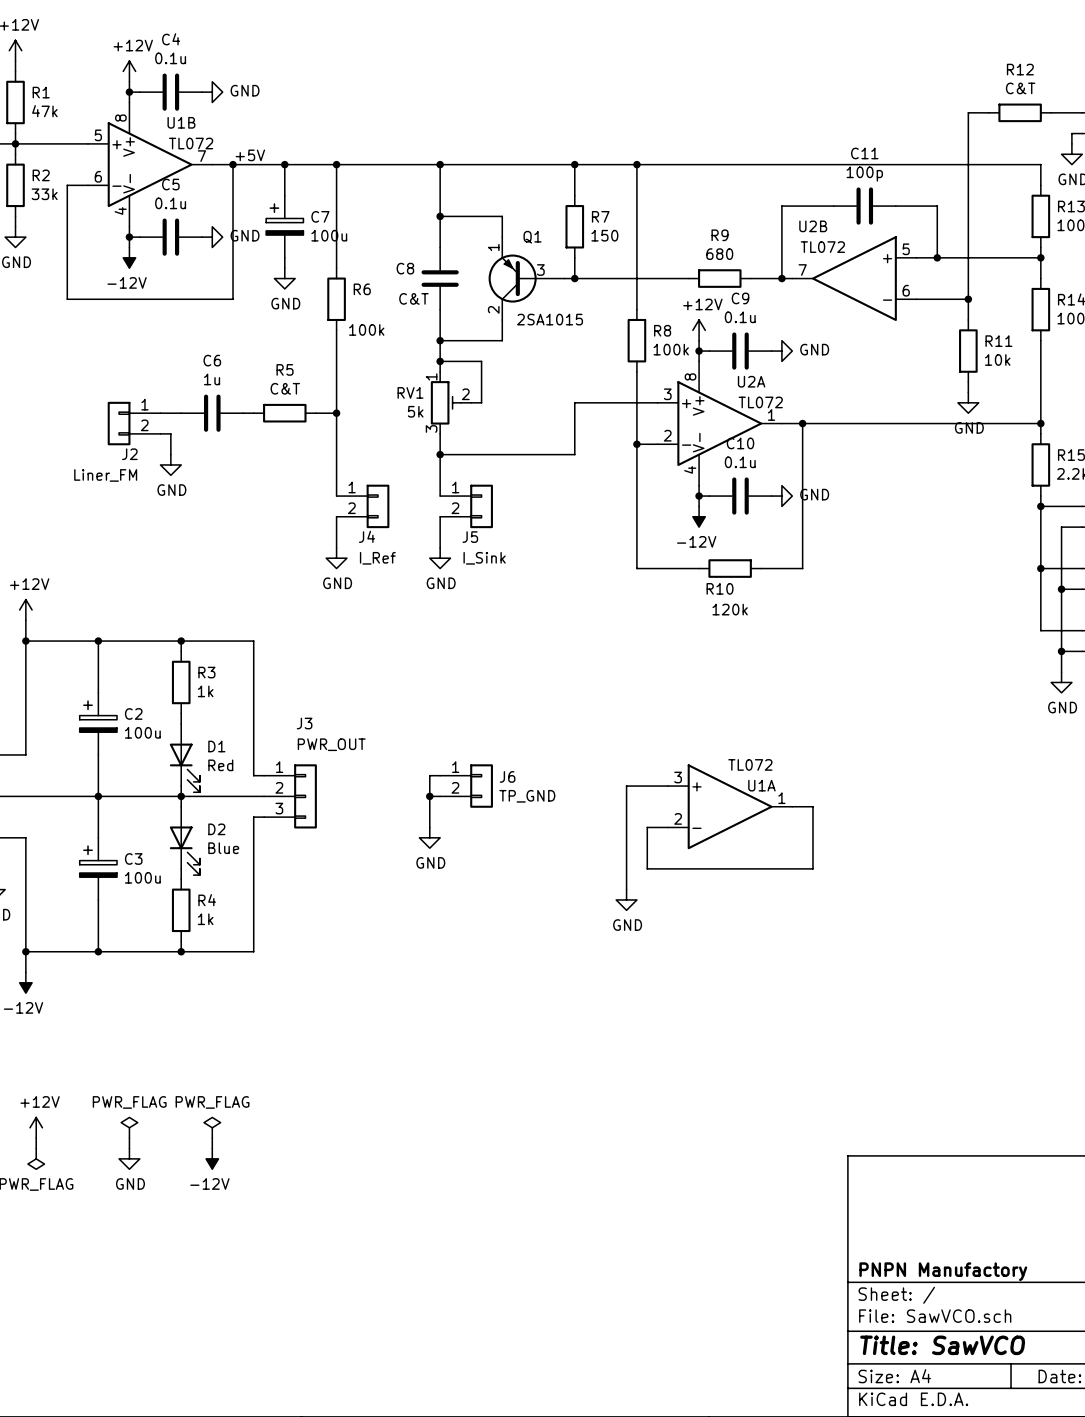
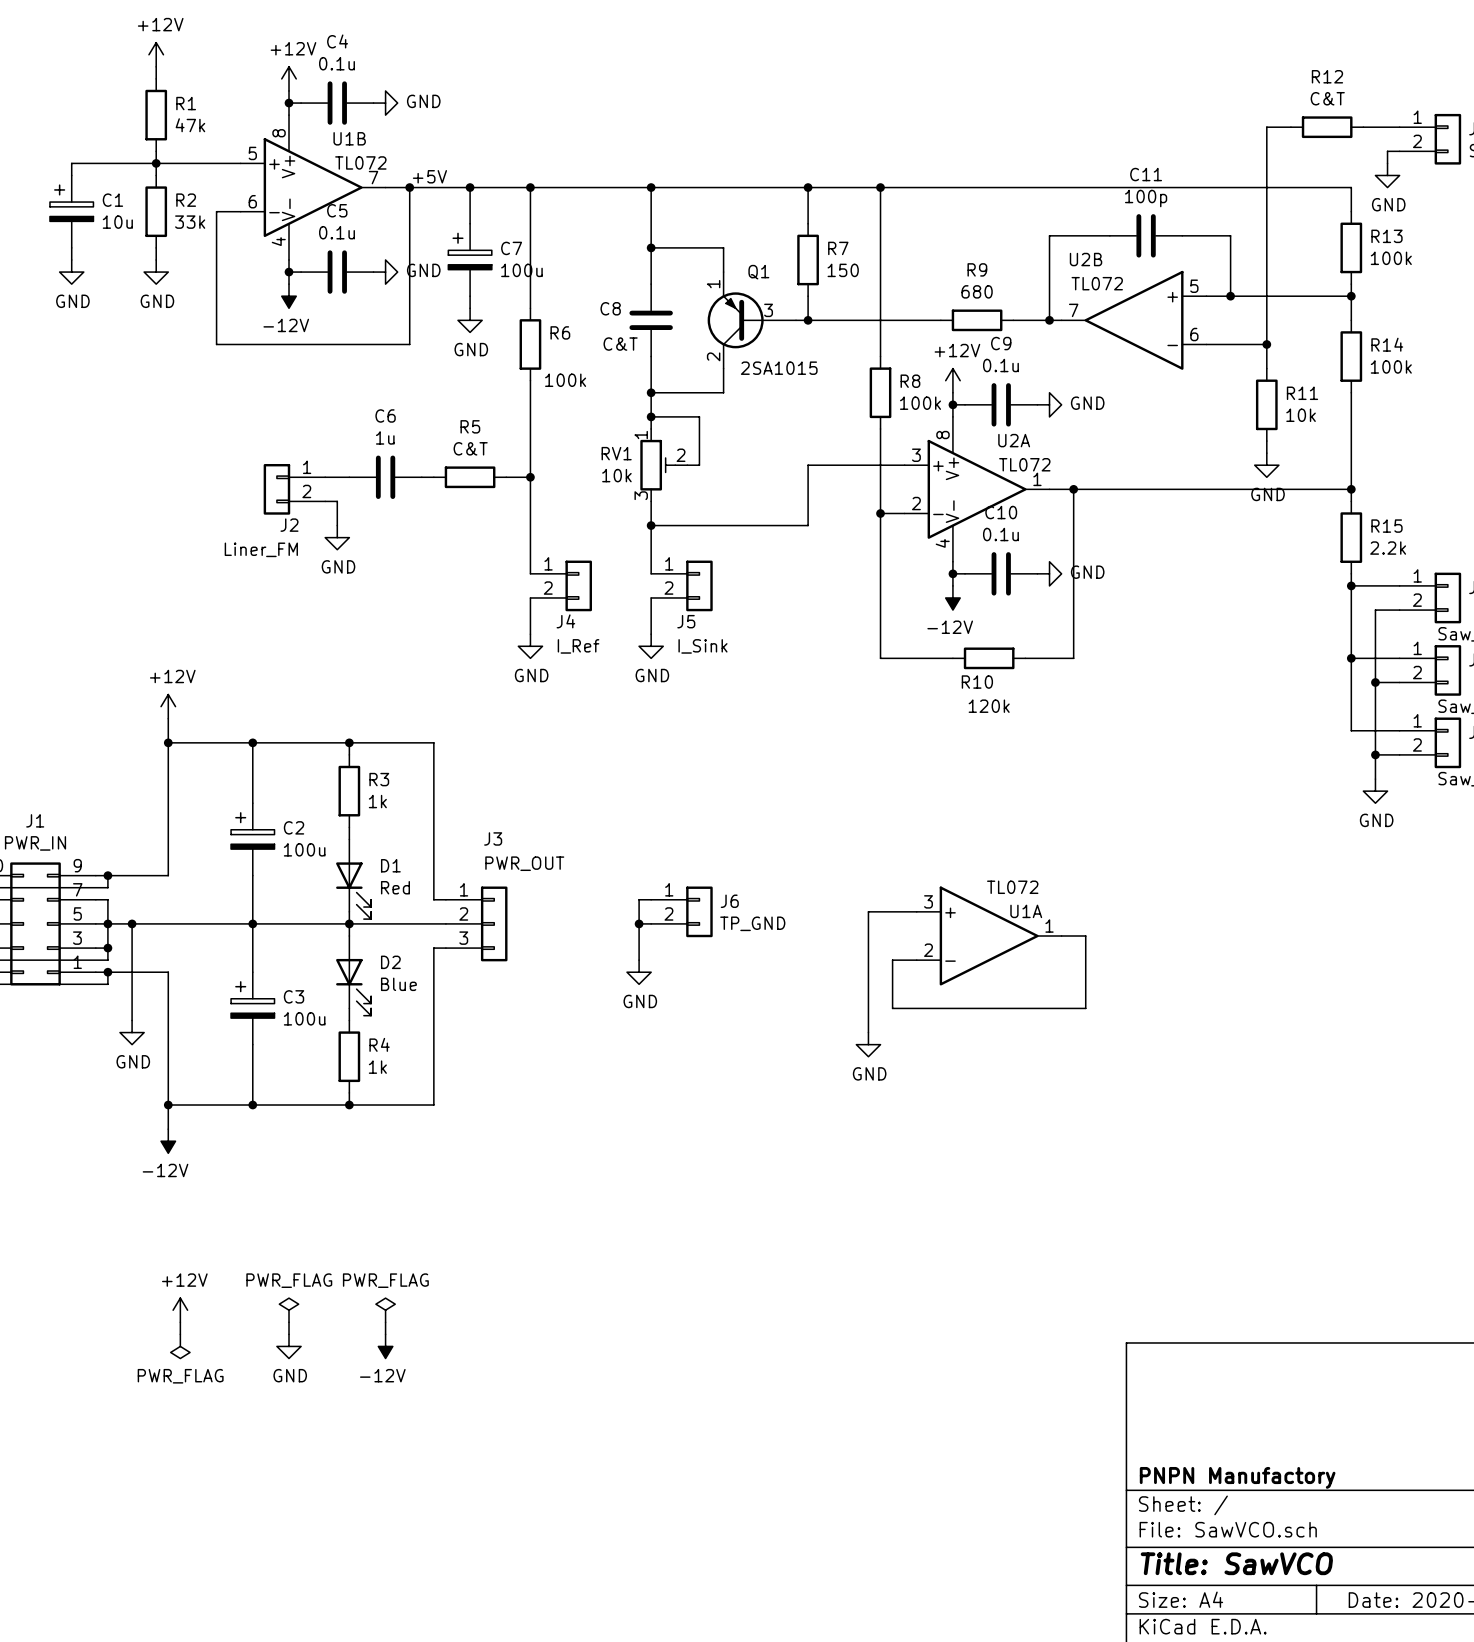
RV1 value: 5k (415, 411) -> 10k (616, 475)

